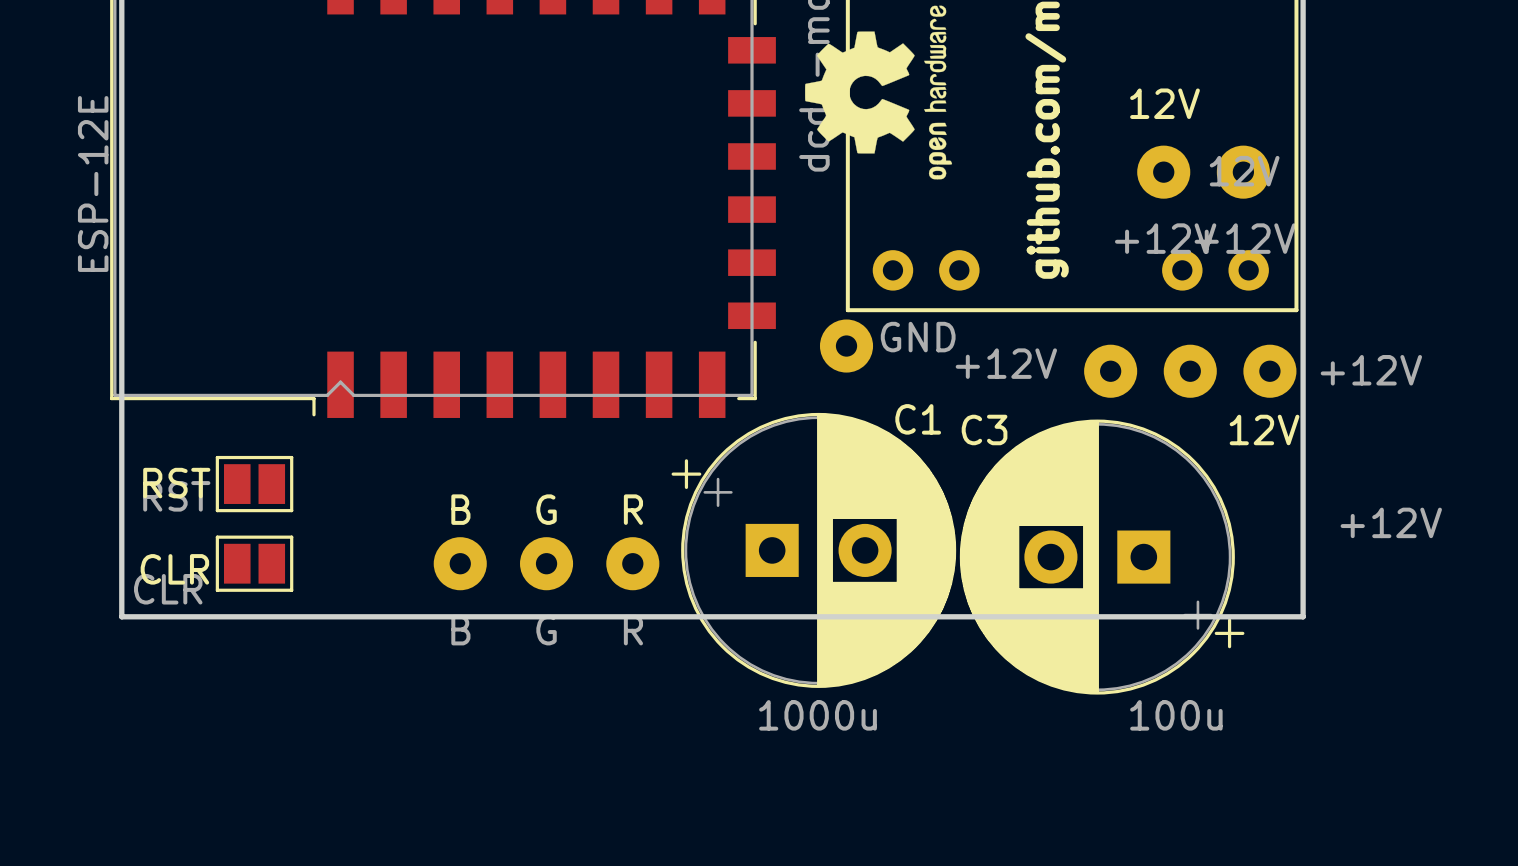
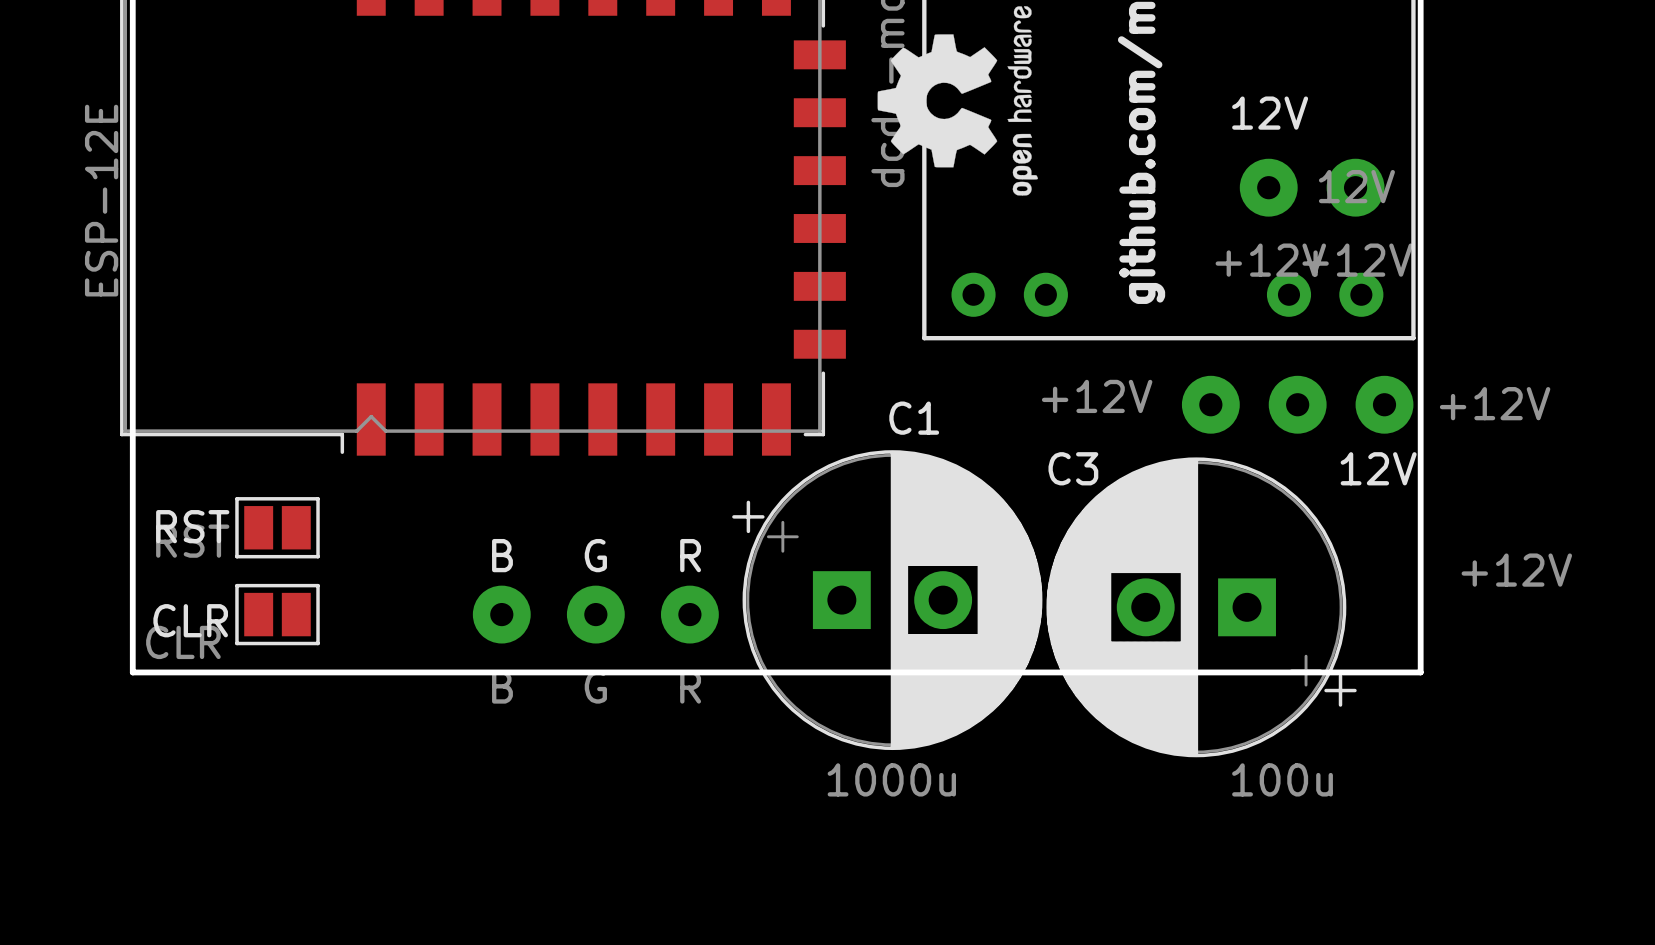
part: GND (846, 346) -> none
C1 name position: C1 (918, 419) -> C1 (914, 418)

